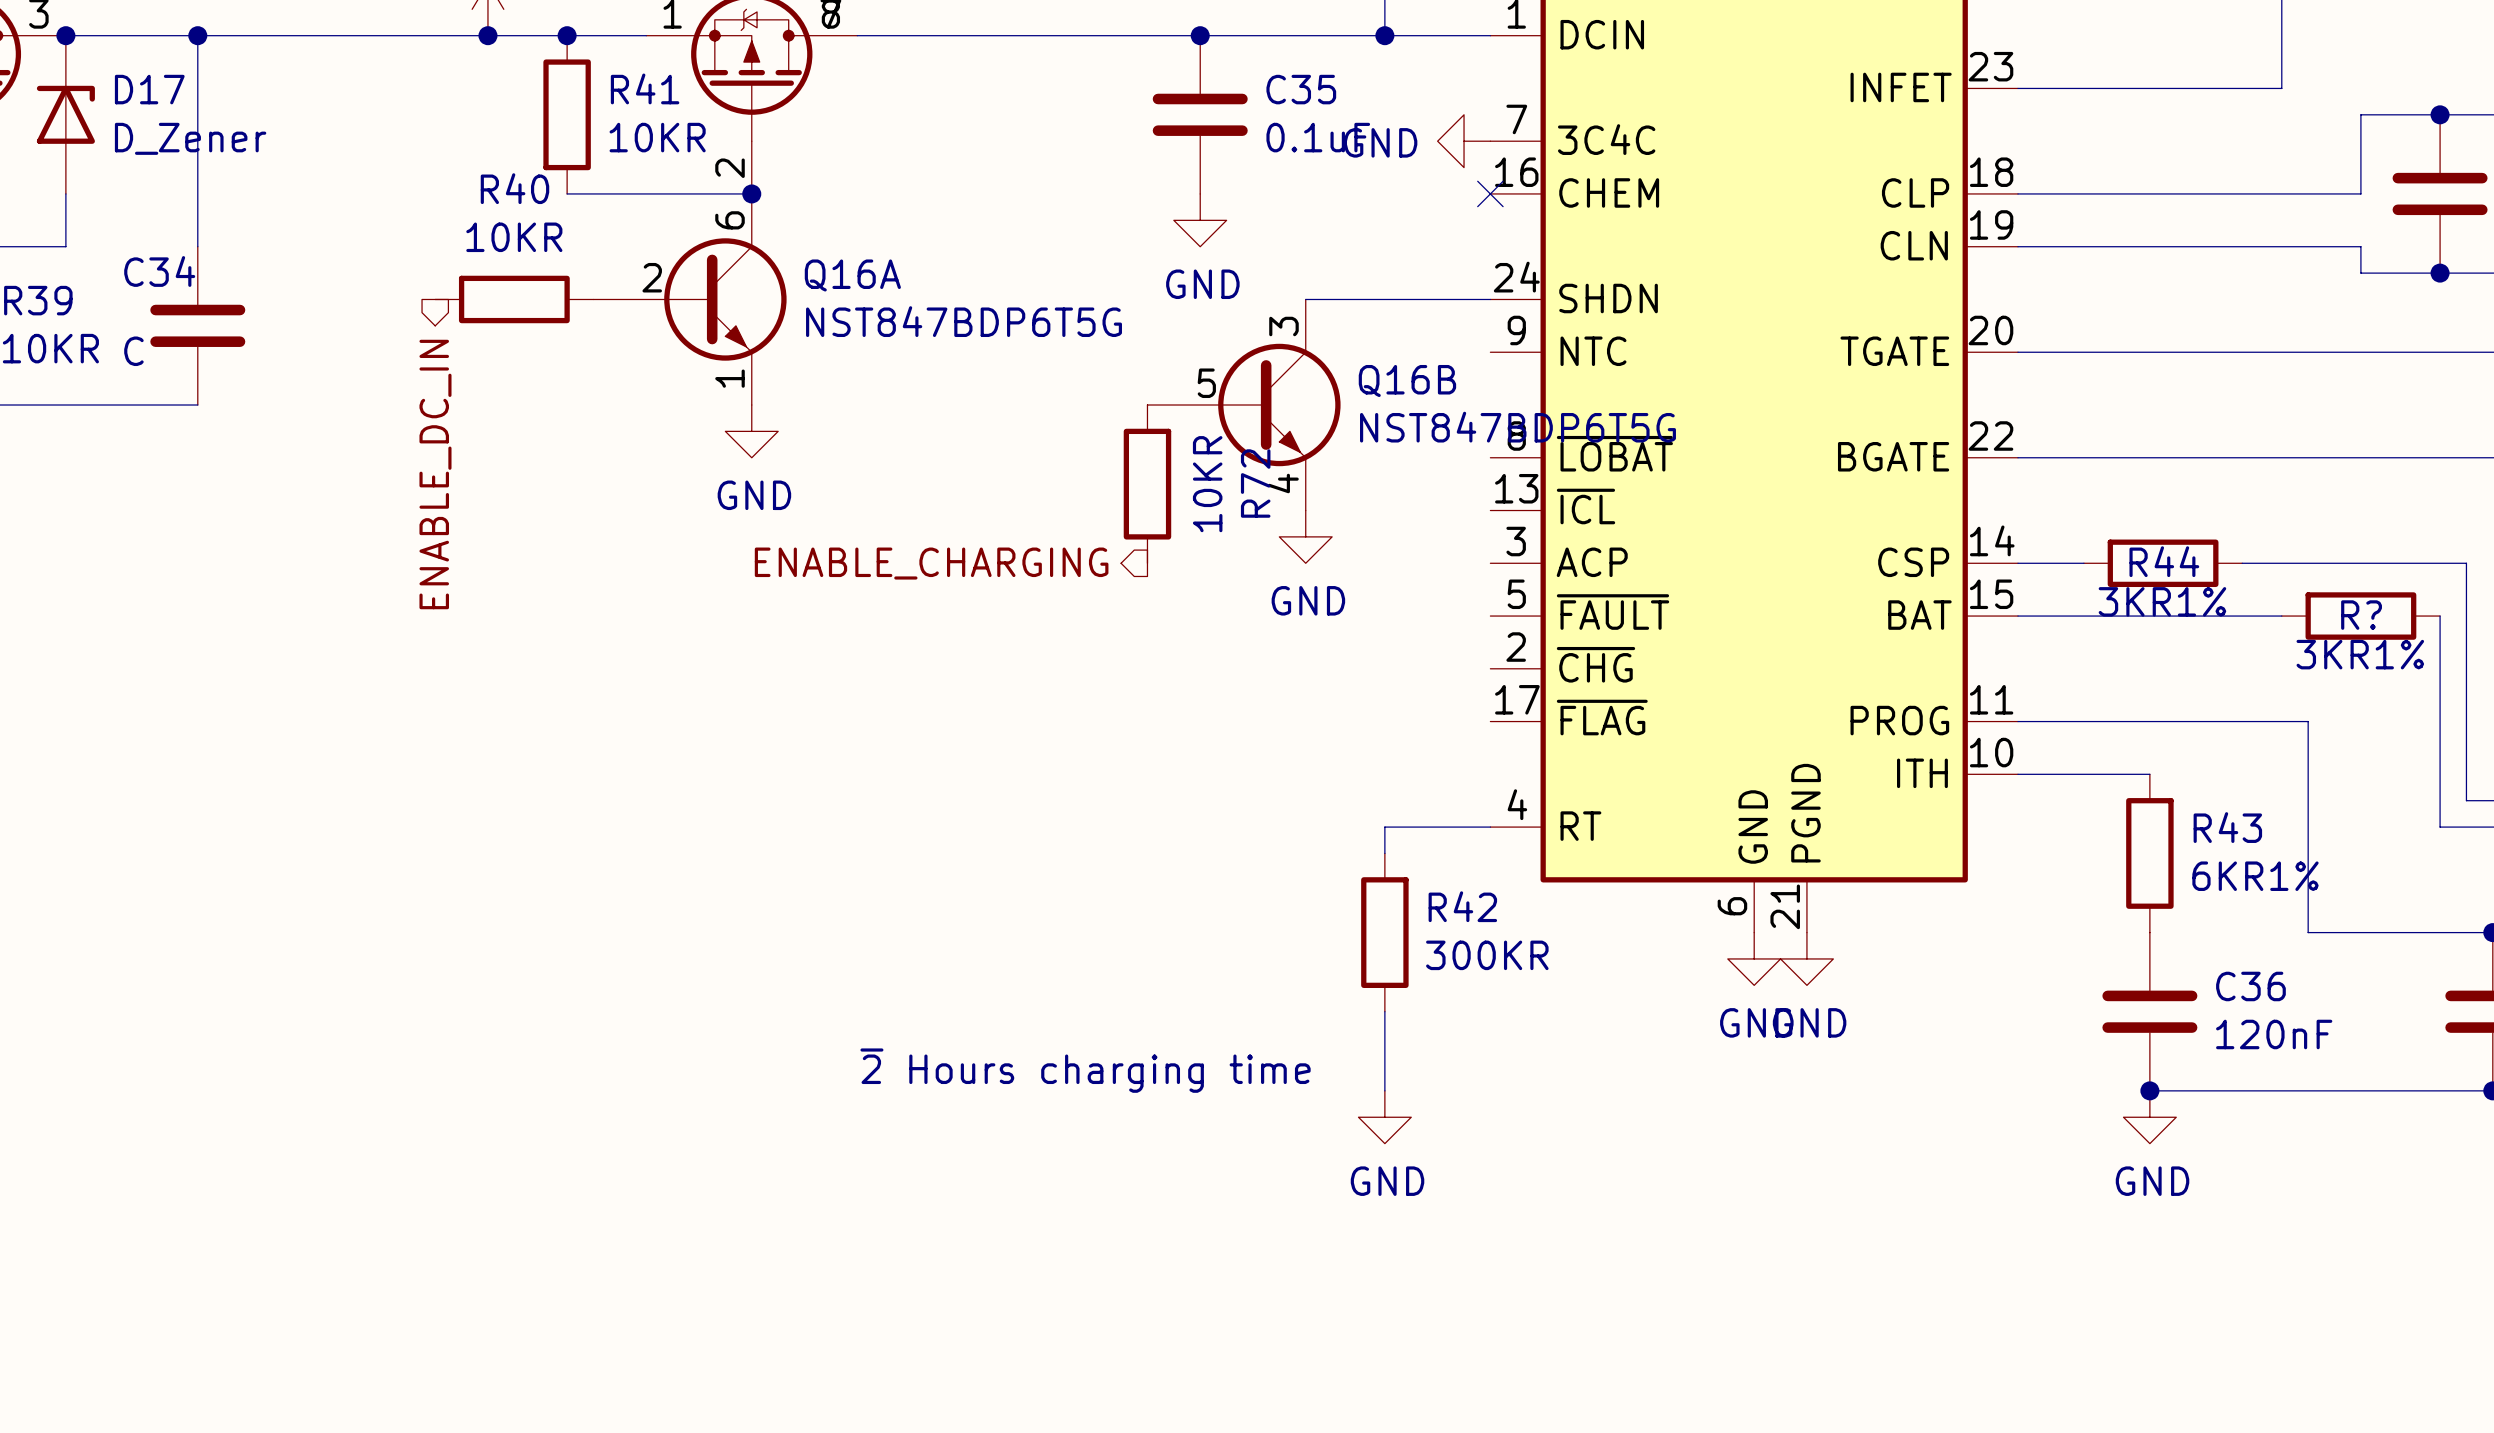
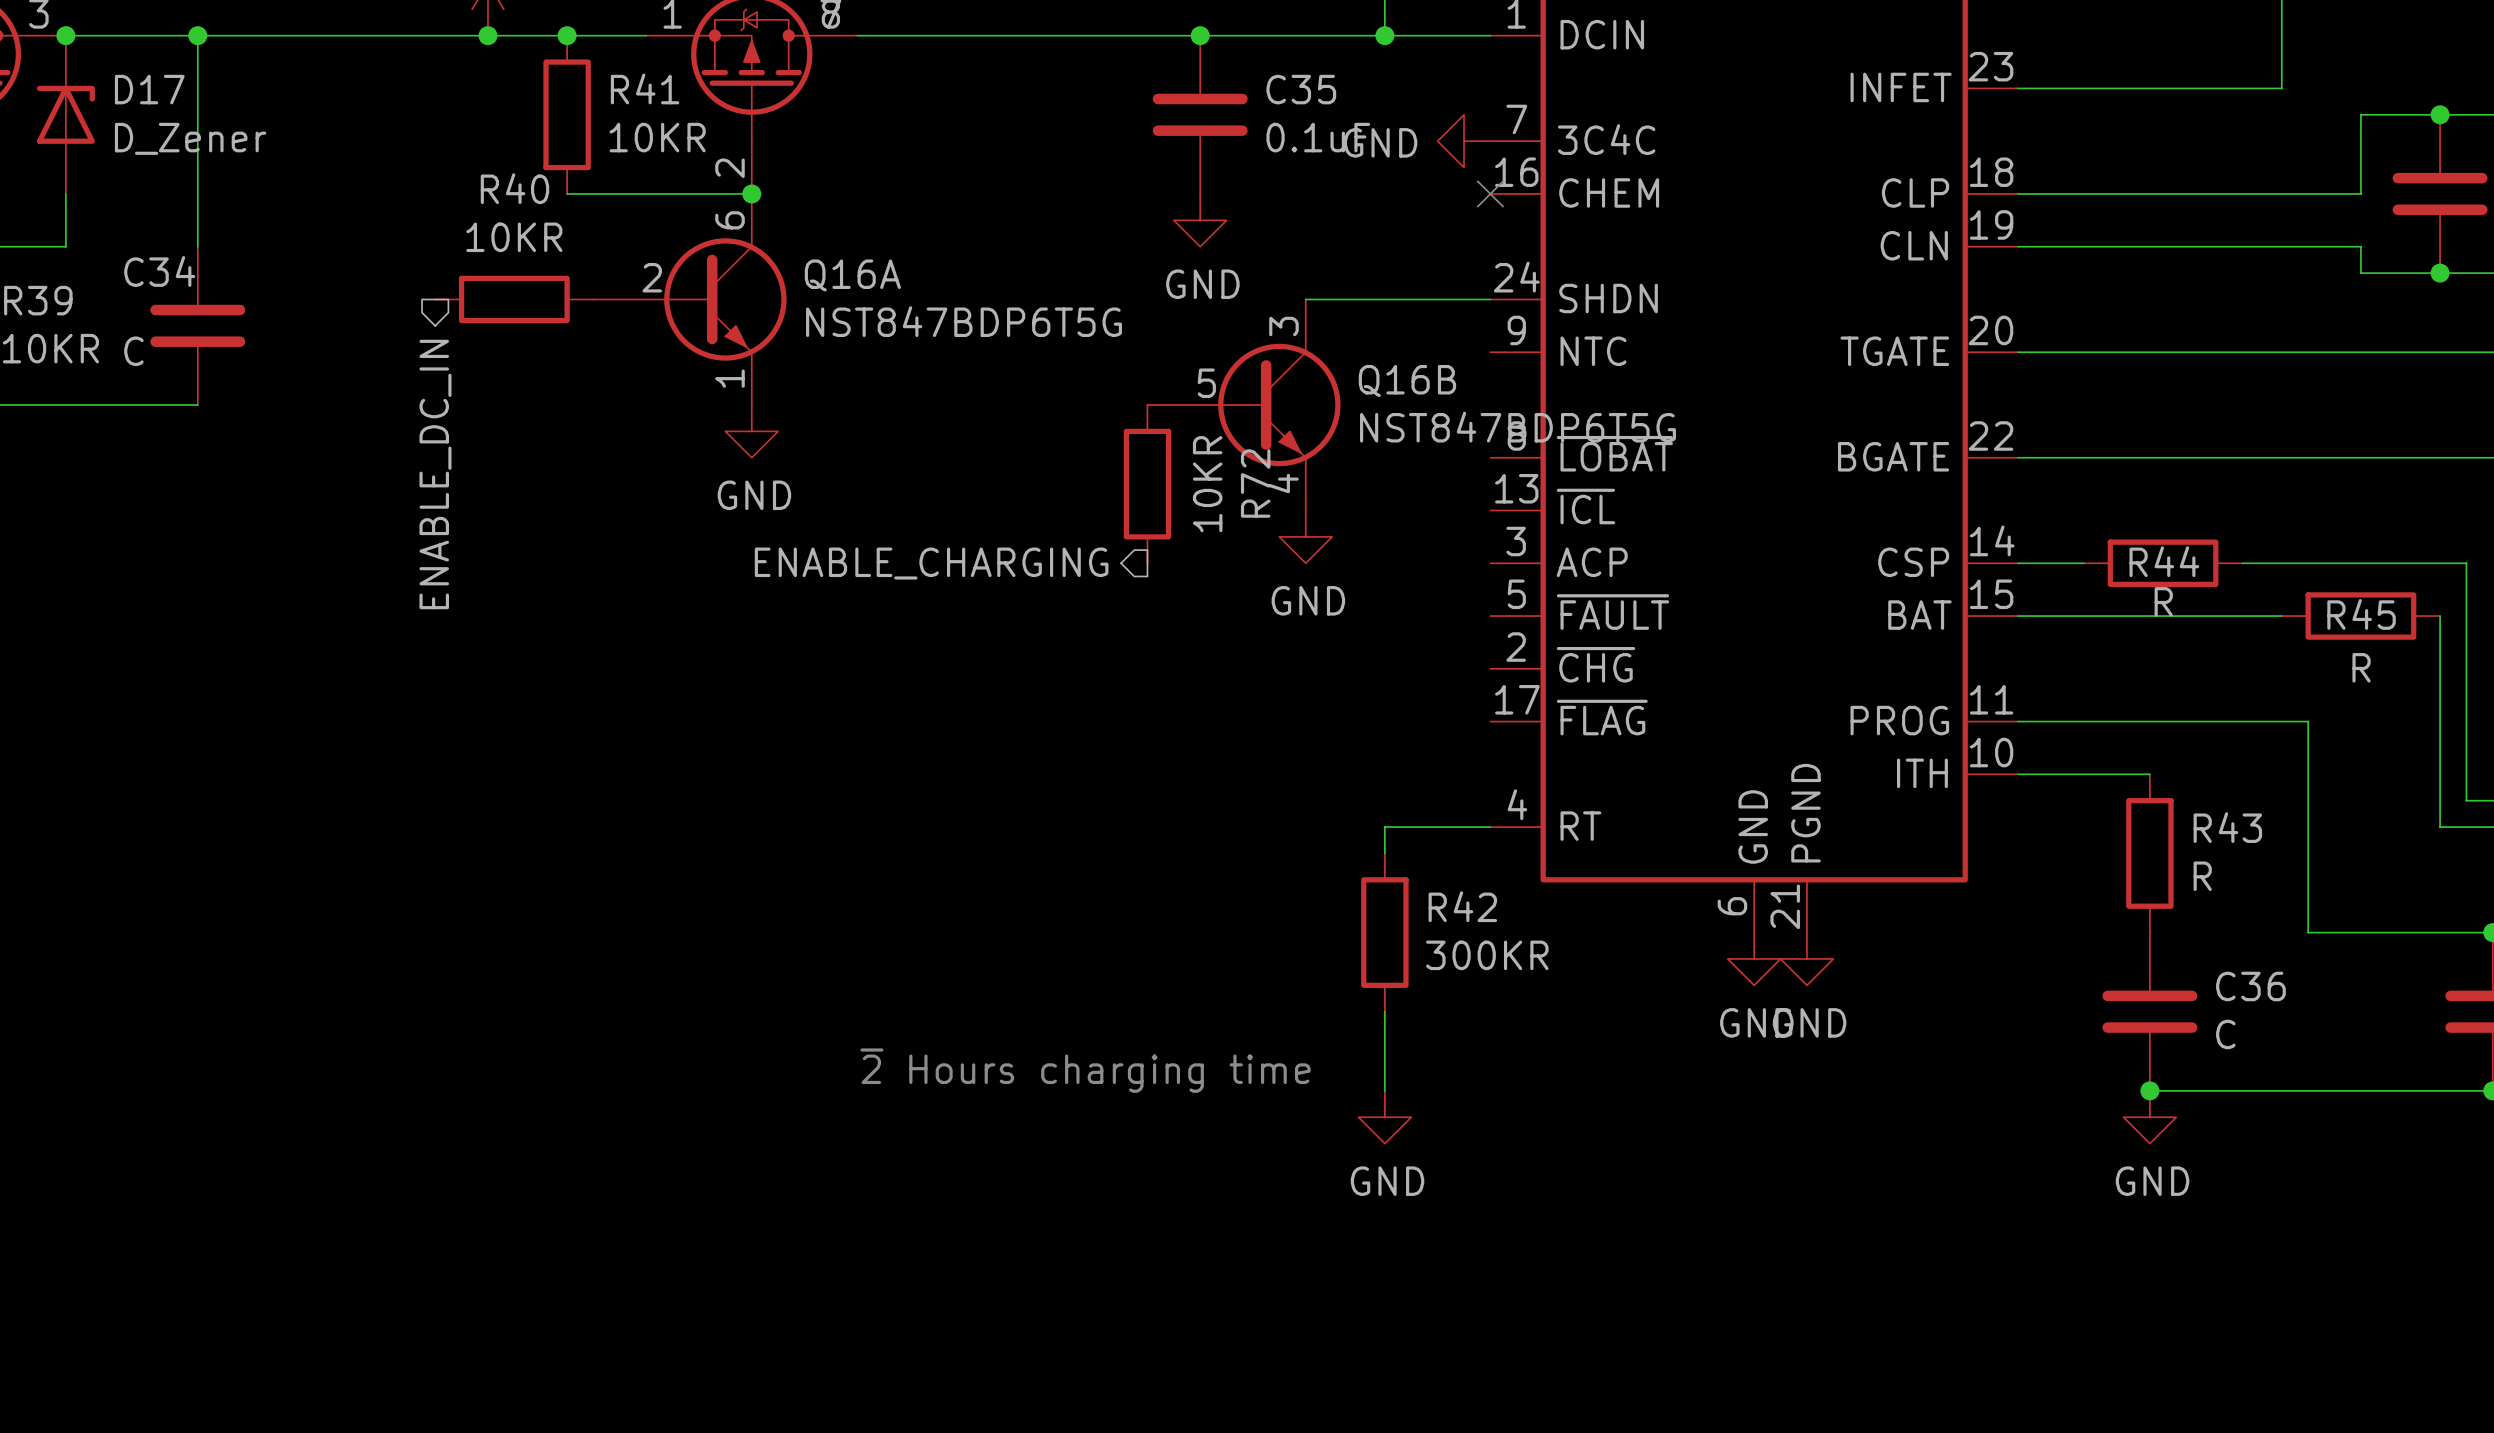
R44 value: 3KR1% (2162, 601) -> R (2163, 601)
R? name: R? (2361, 615) -> R45 (2361, 614)
R? value: 3KR1% (2360, 654) -> R (2361, 667)
R43 value: 6KR1% (2255, 876) -> R (2202, 876)
C36 value: 120nF (2274, 1034) -> C (2225, 1034)

